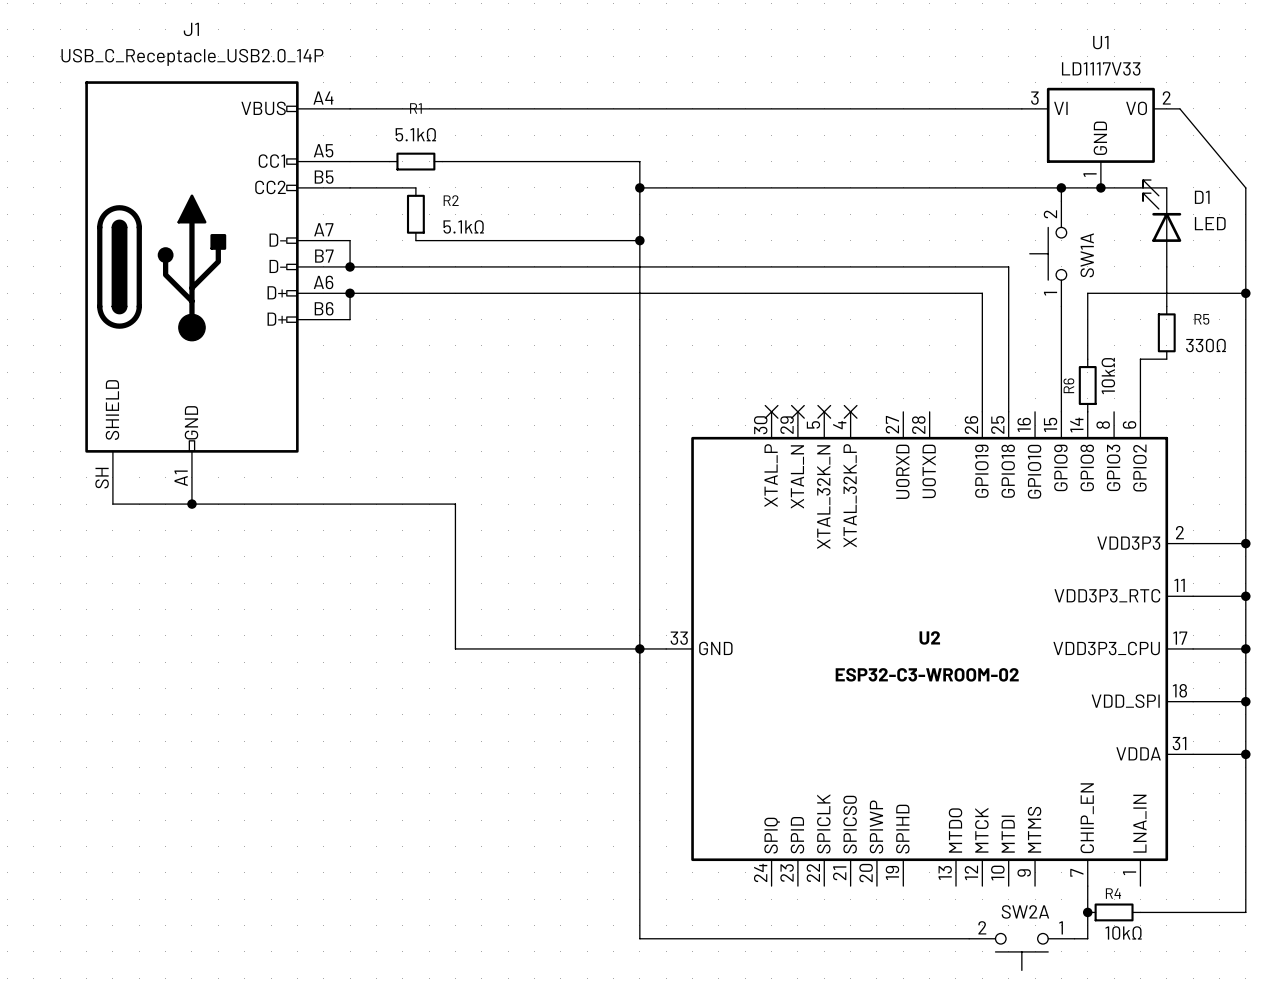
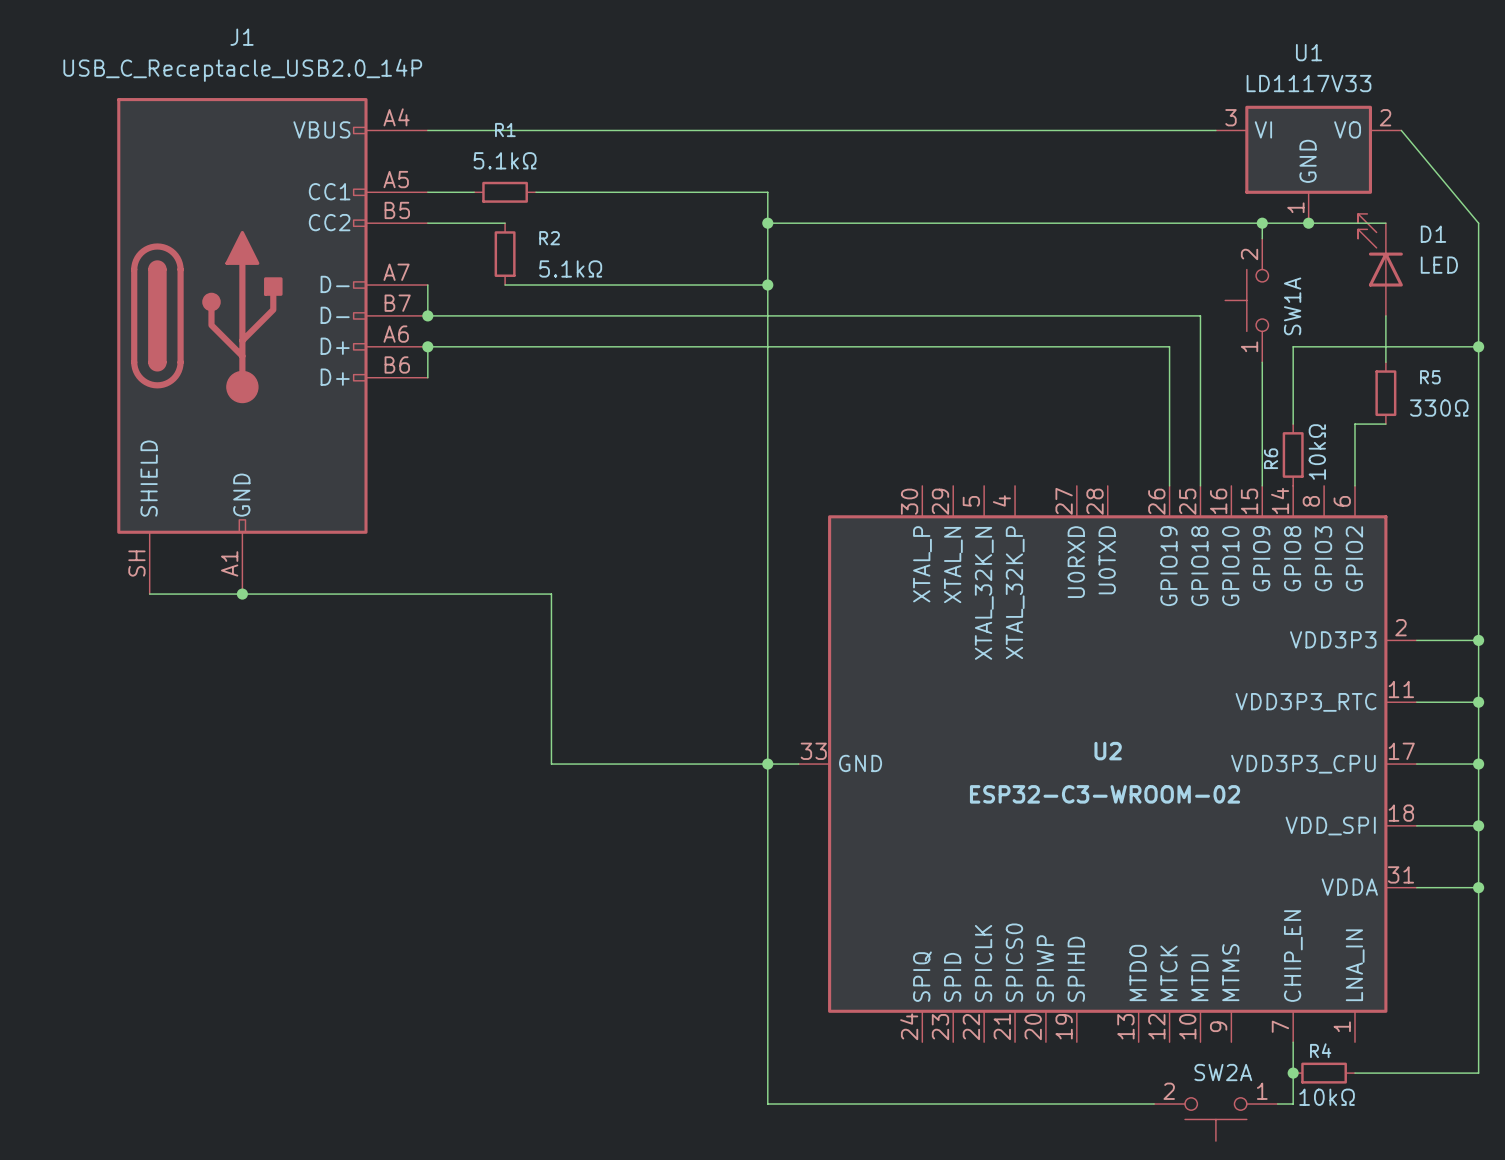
no-connect mark: (771, 411) -> none
no-connect mark: (797, 411) -> none
no-connect mark: (824, 411) -> none
no-connect mark: (850, 411) -> none

